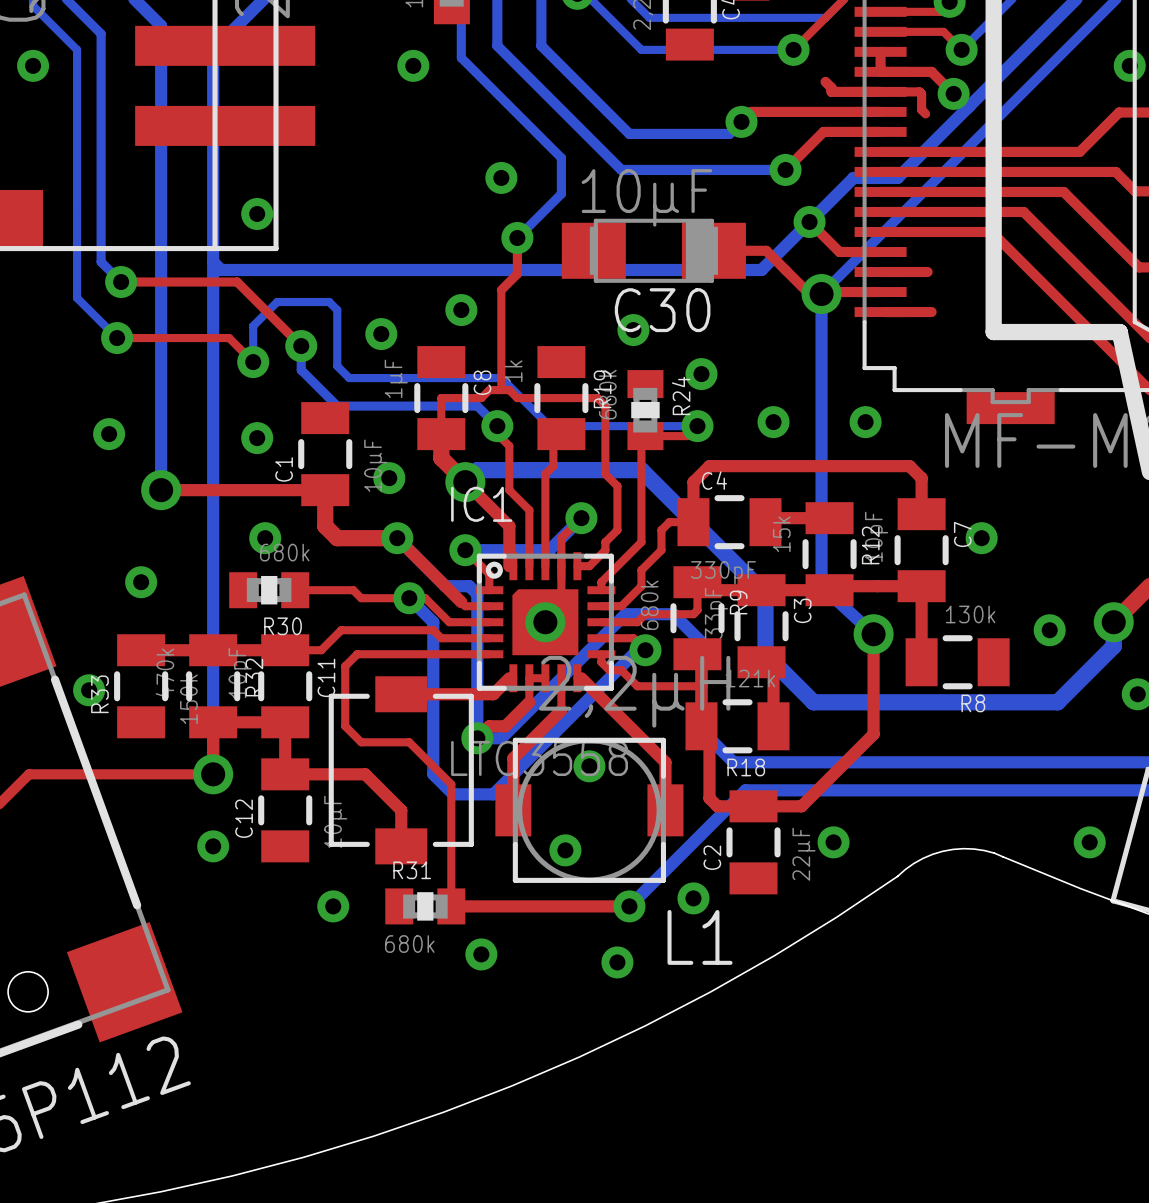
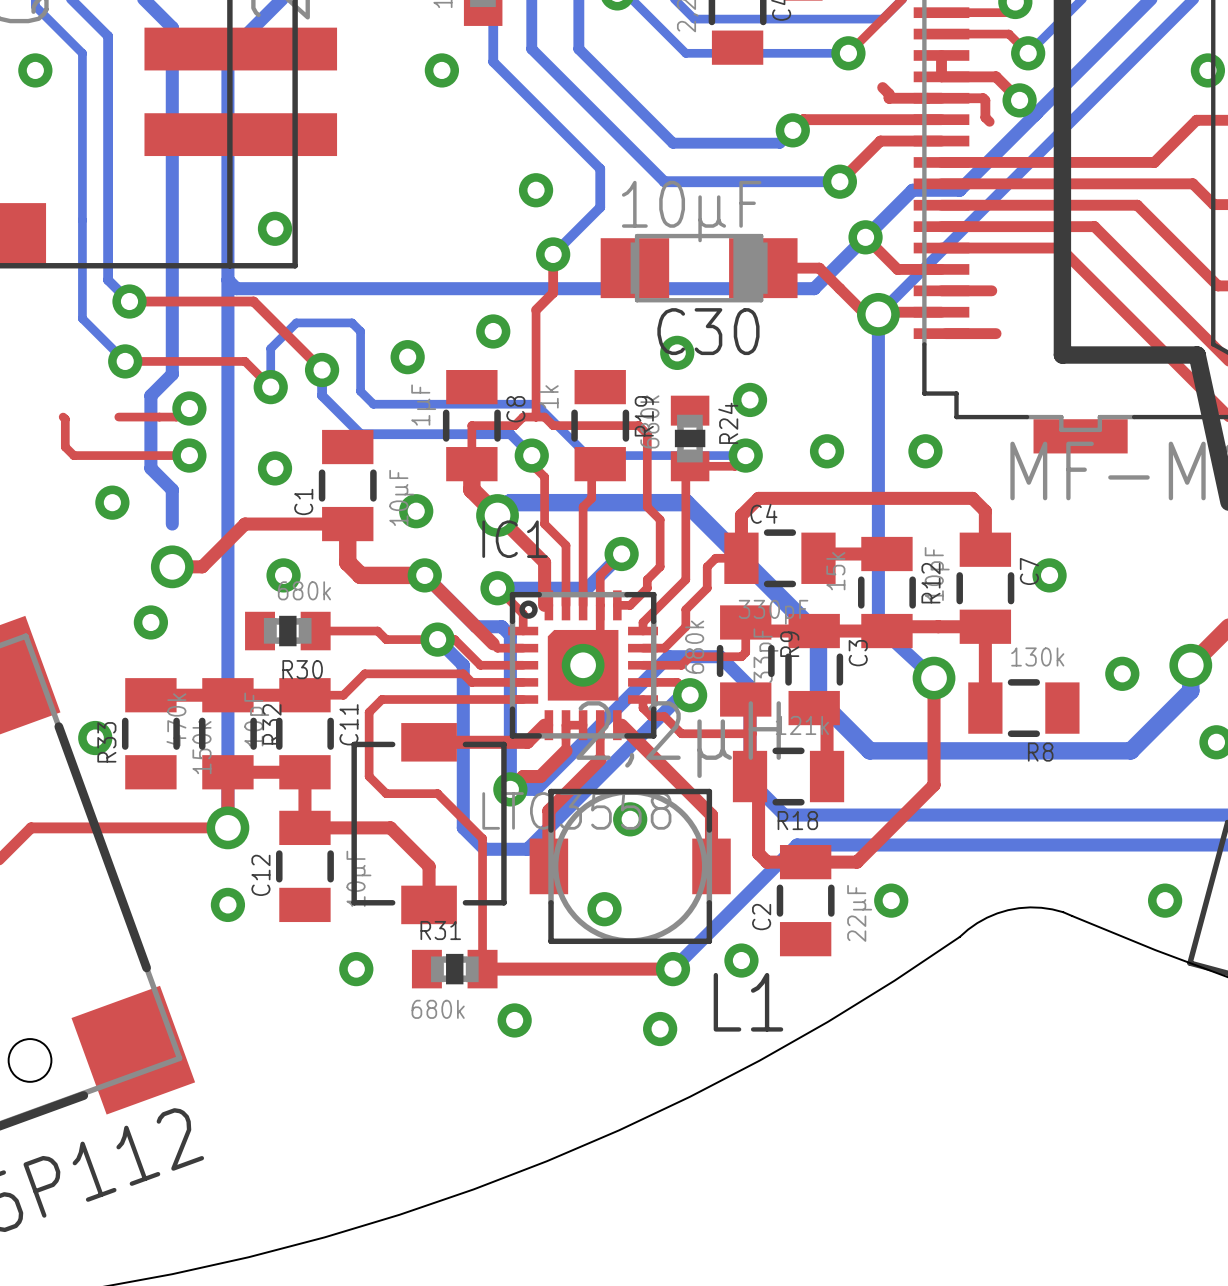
bottom track: (161, 350) (161, 458) -> (172, 374) (150, 395) (150, 468) (172, 489)
top track: none -> (189, 408) (176, 417) (118, 417)
via: none -> (189, 408)
top track: none -> (63, 417) (65, 419) (65, 447) (73, 455) (189, 455)
via: none -> (189, 455)
via: (109, 434) -> none
via: none -> (112, 502)
top track: (161, 490) (229, 490) -> (172, 566) (202, 566) (245, 524)
via position: (161, 490) -> (172, 566)

